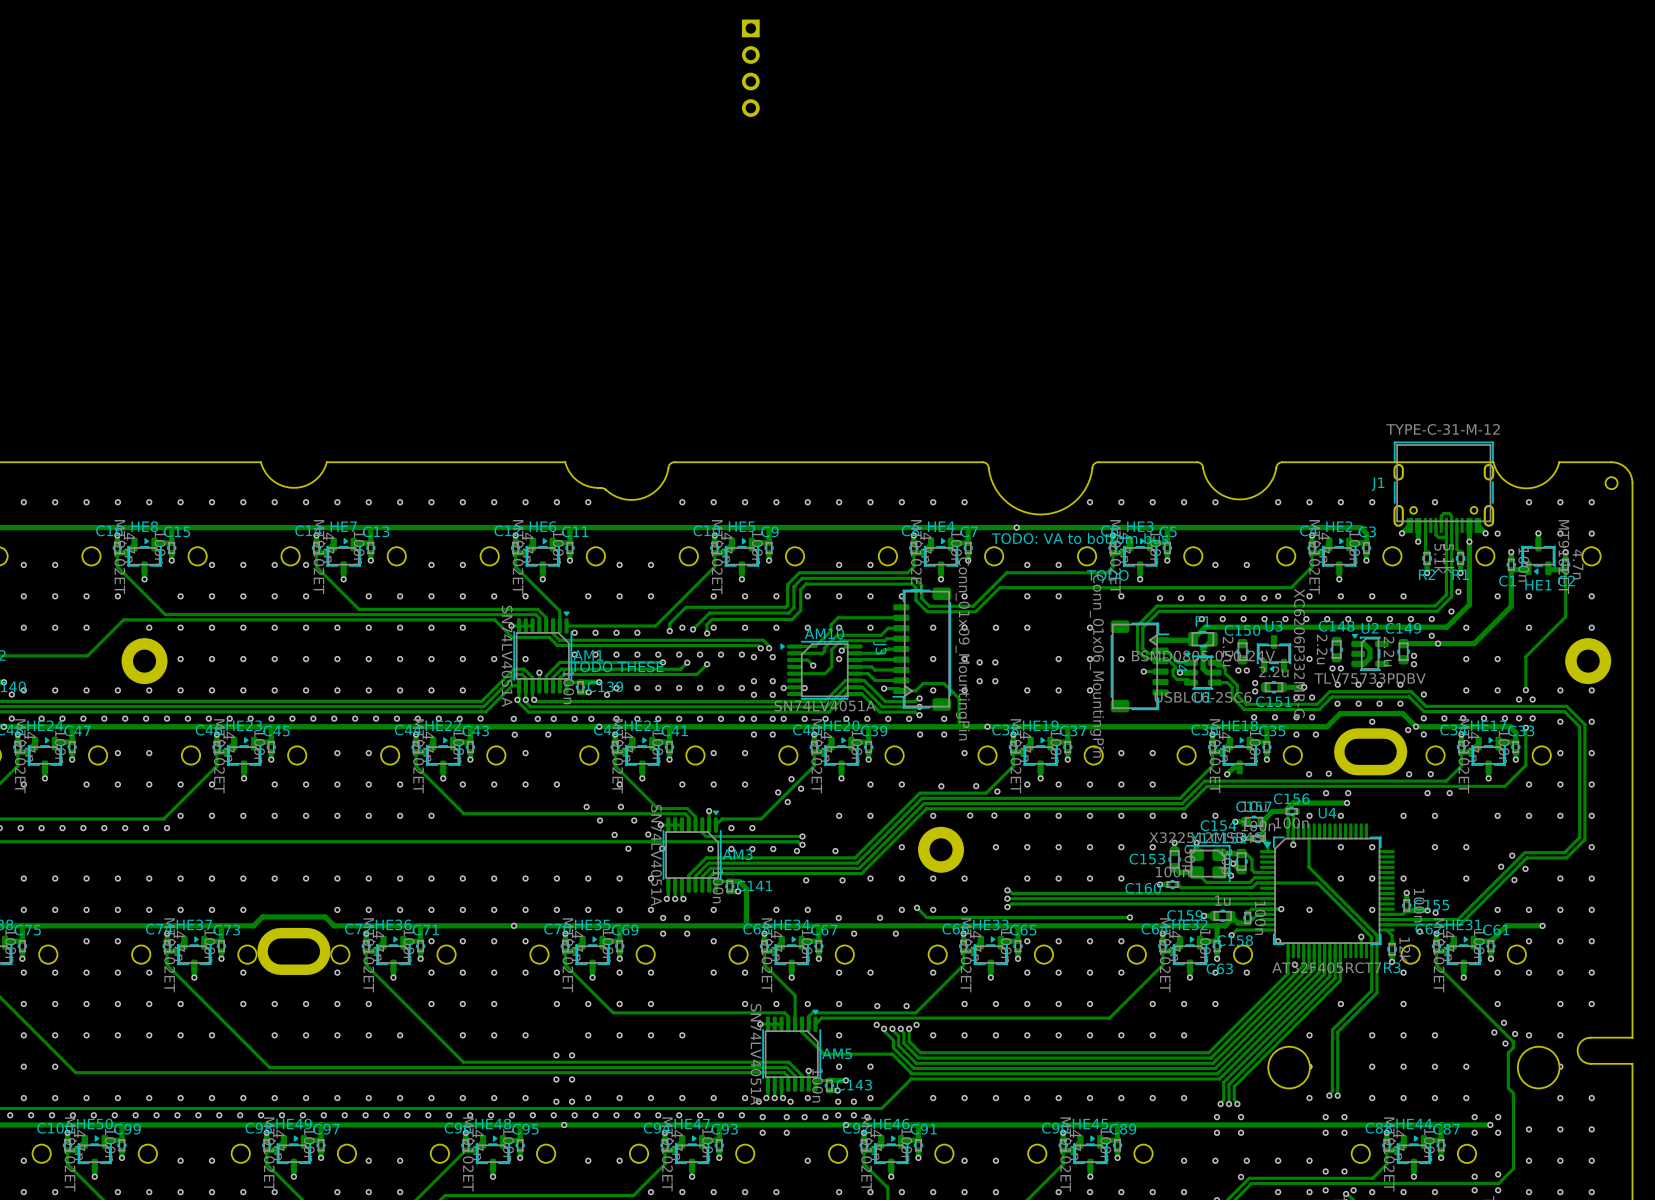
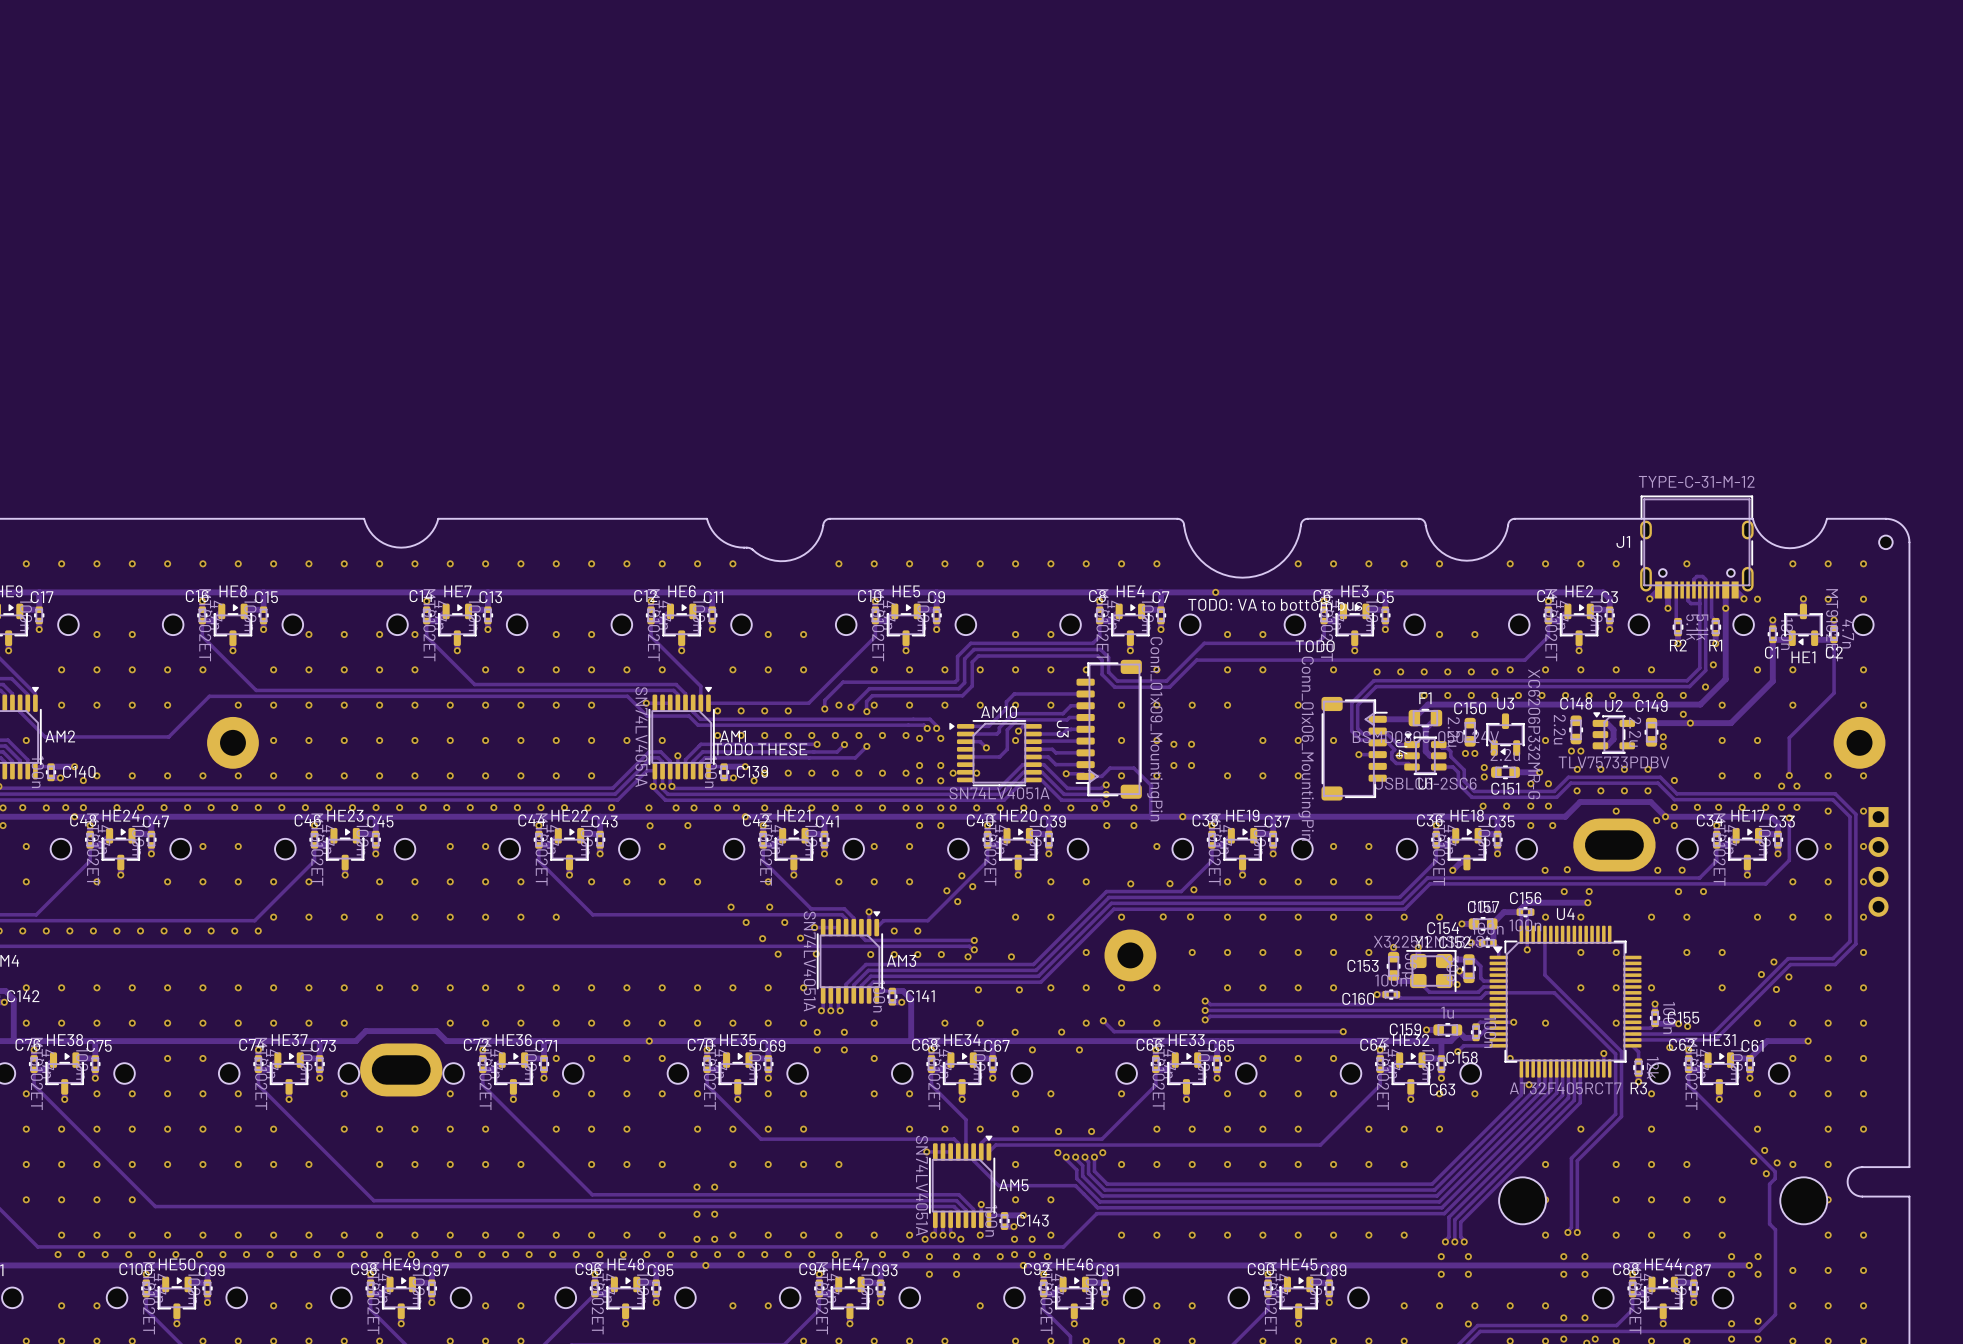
part: (750, 68) -> none
part: none -> (1878, 861)

